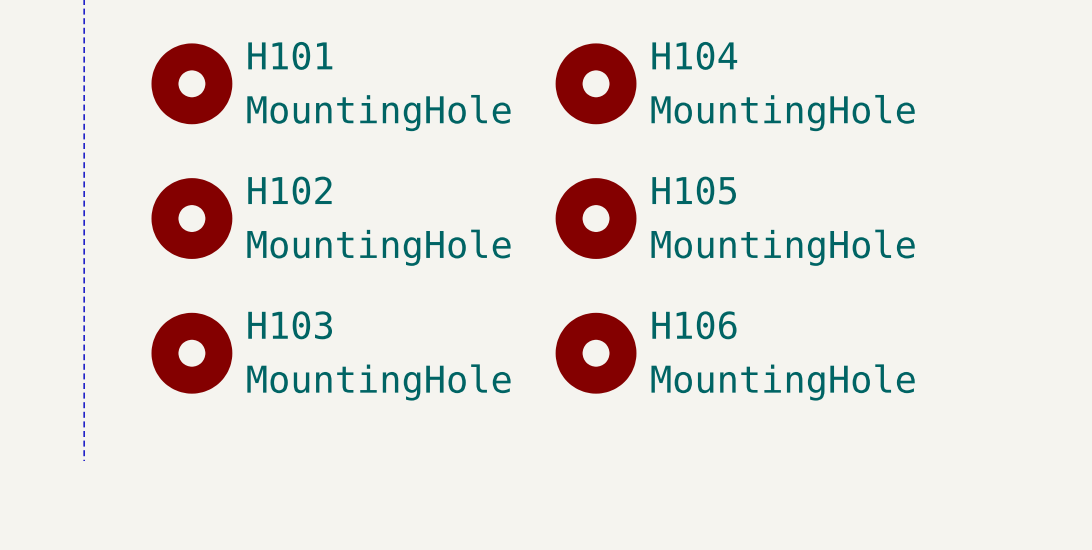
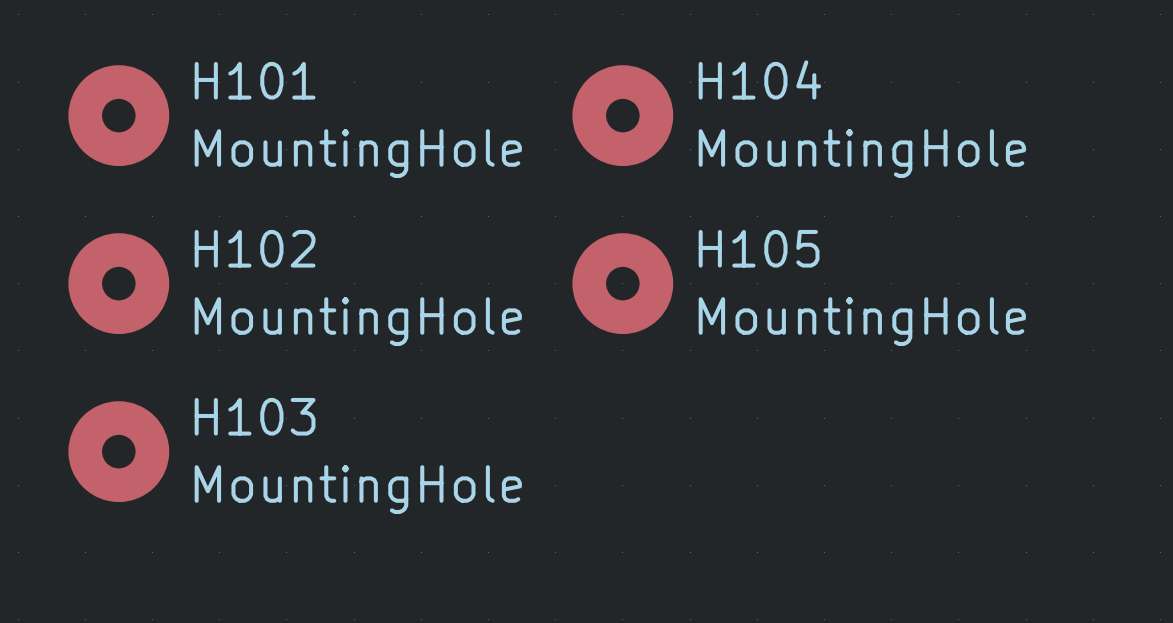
H106: MountingHole (596, 353) -> none

